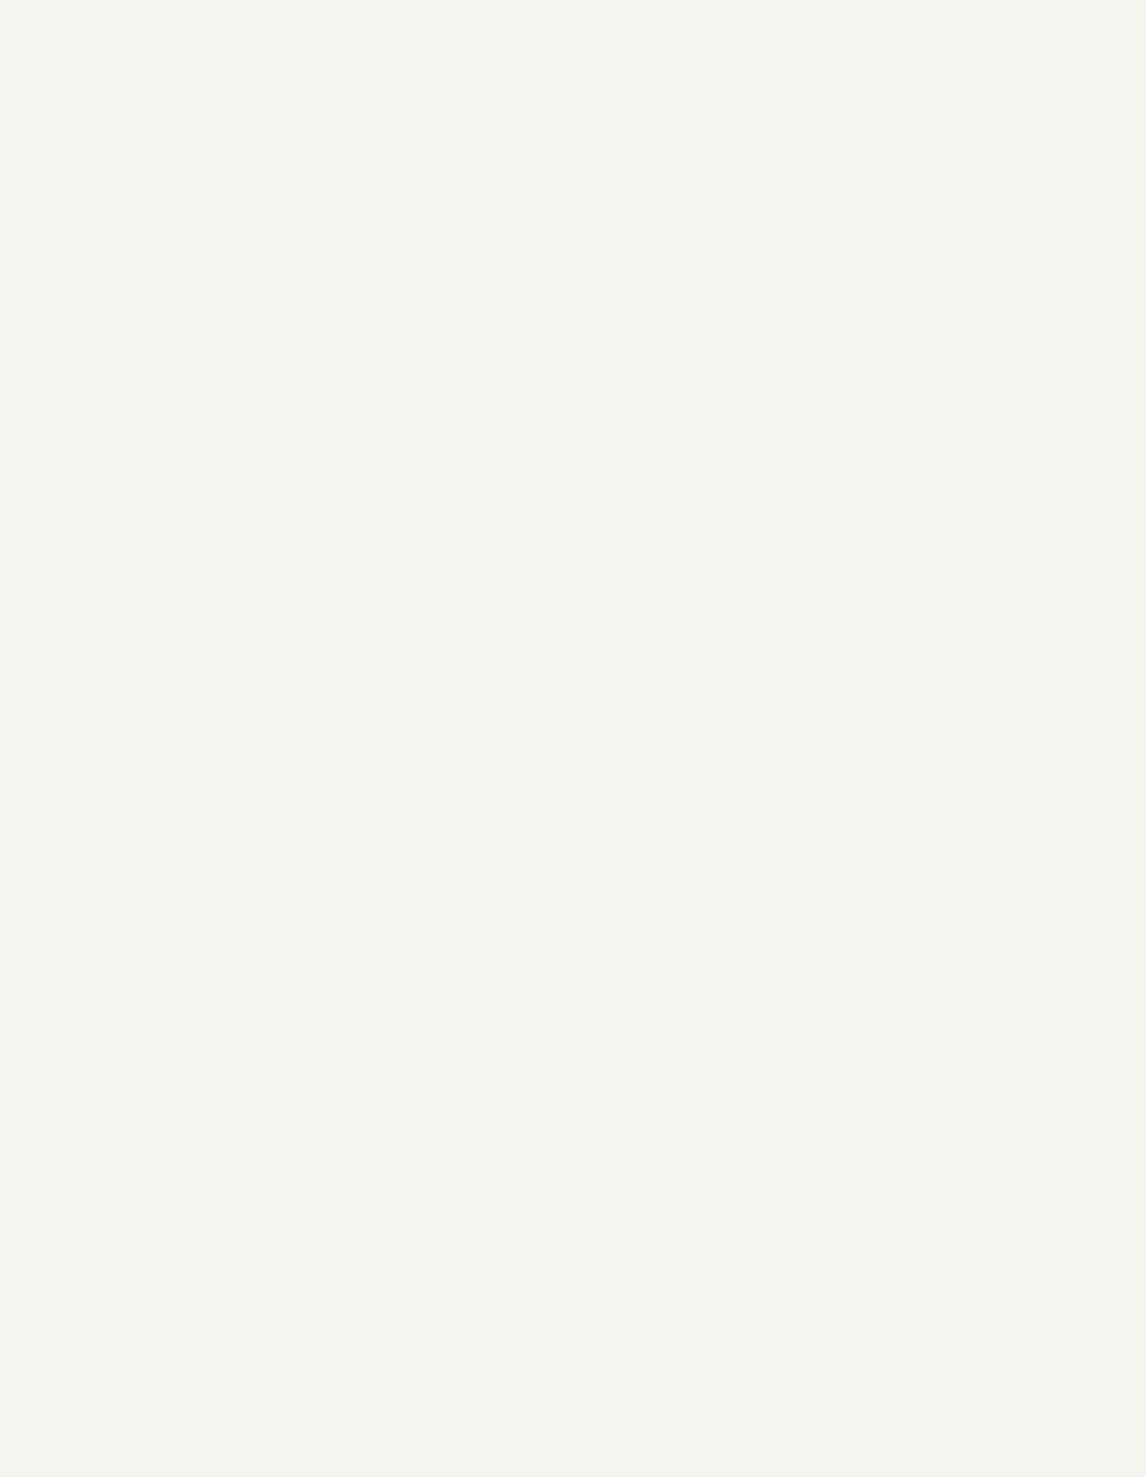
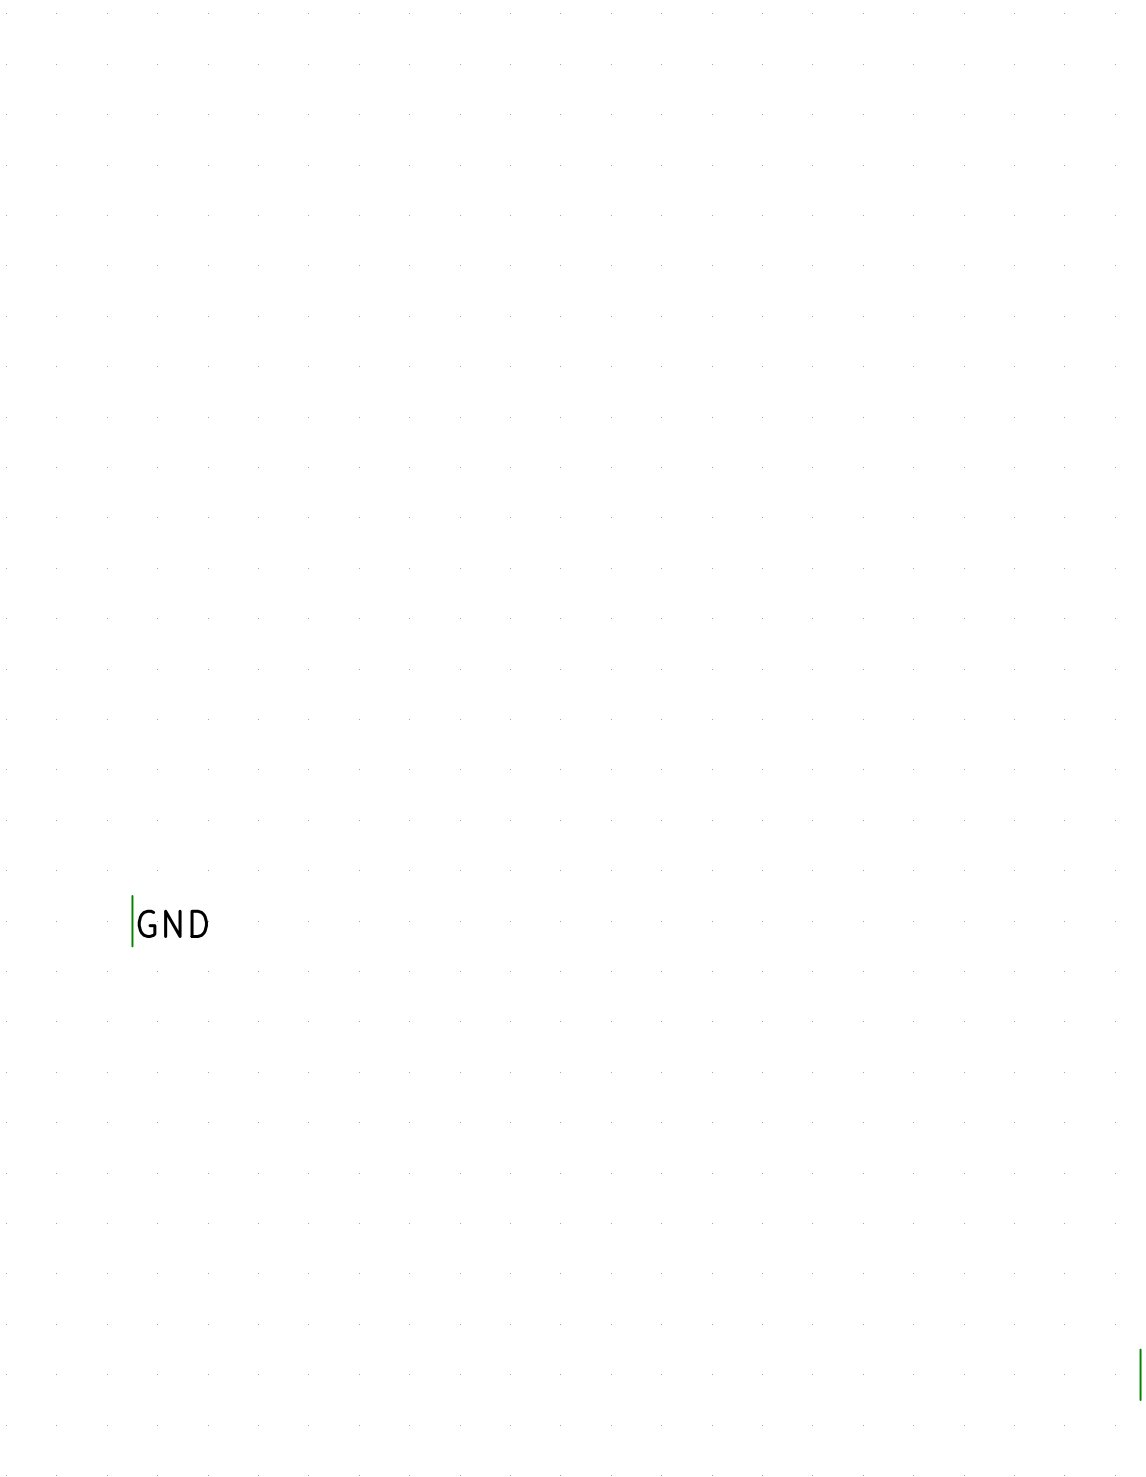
wire: none -> (132, 895) (132, 946)
label: none -> GND (172, 923)
wire: none -> (1140, 1349) (1140, 1400)

